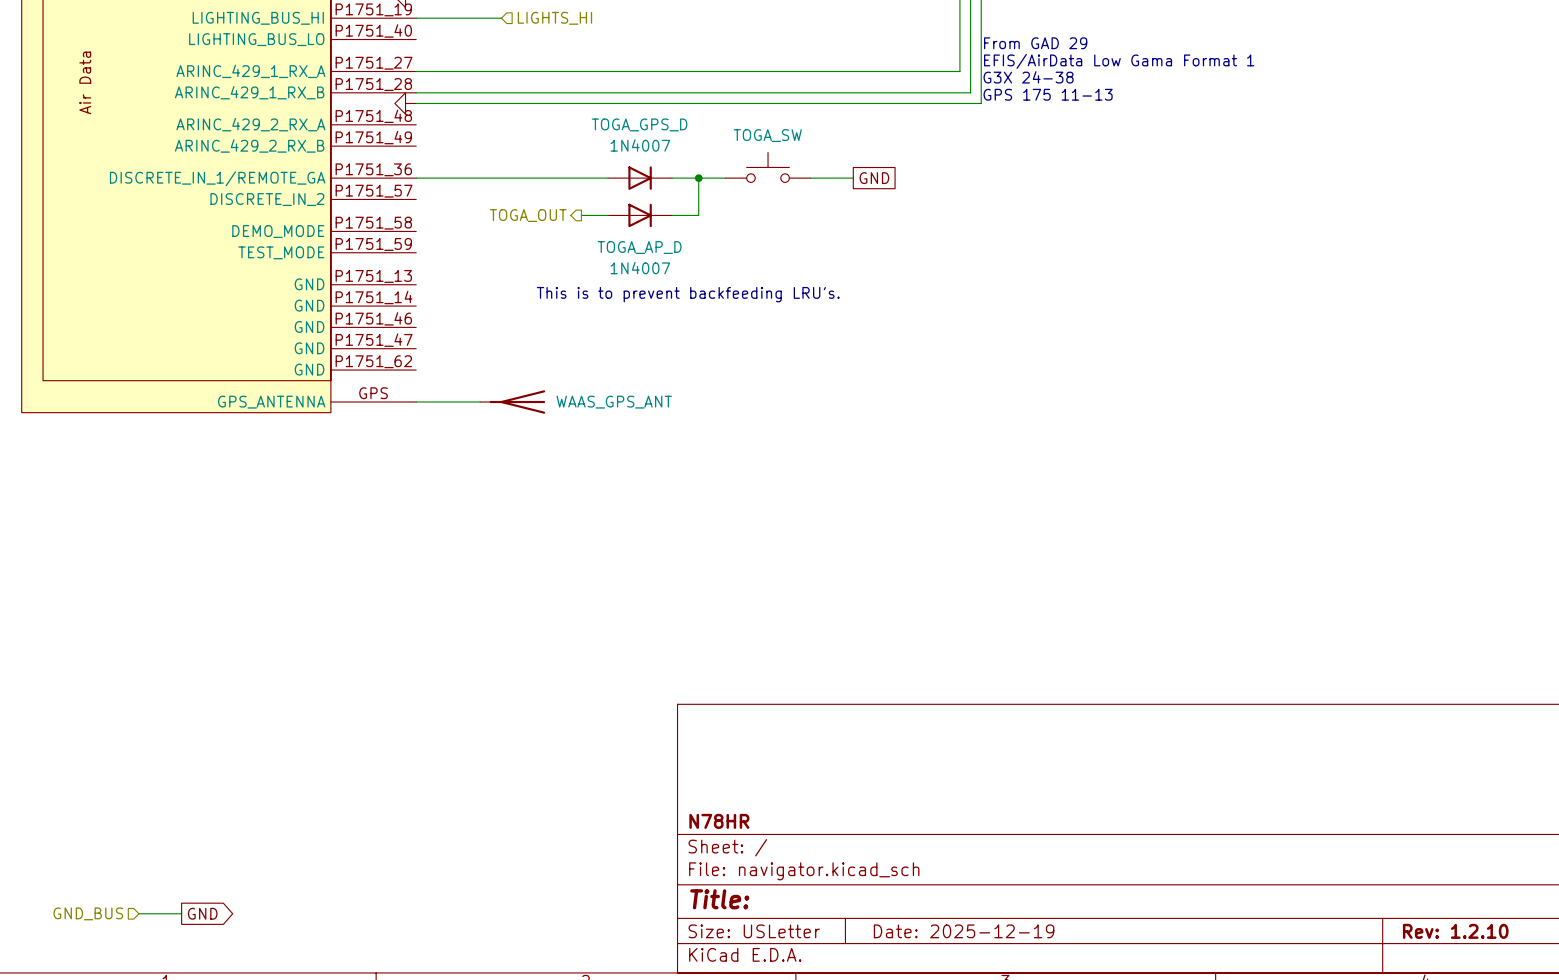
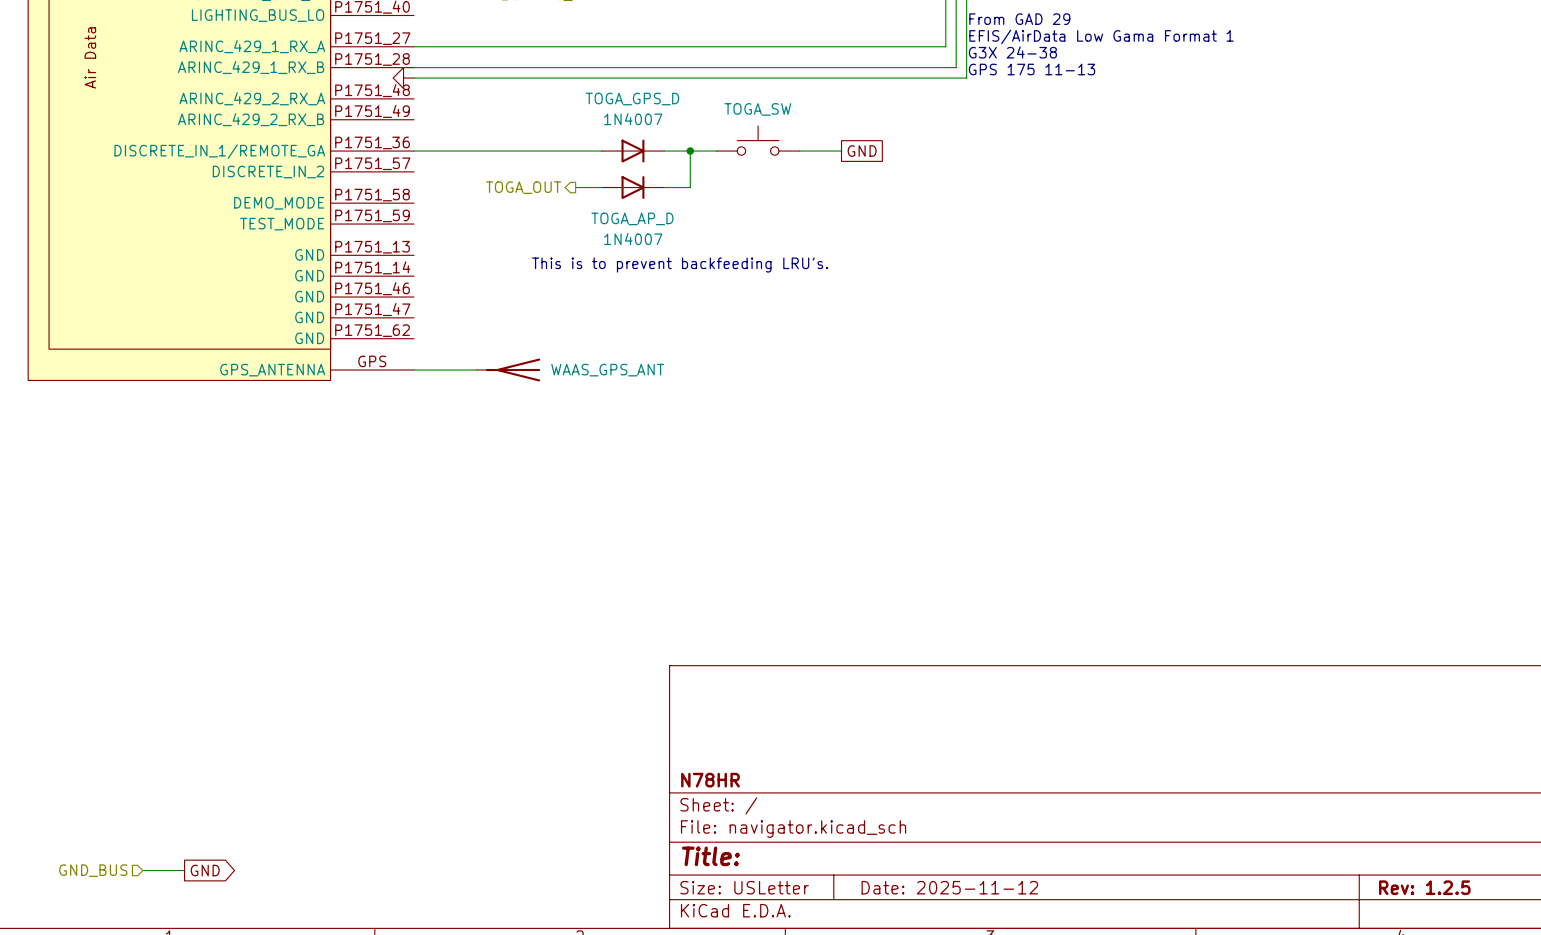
title block: Date: 2025-12-19 (964, 931) -> Date: 2025-11-12 (949, 887)
title block: Rev: 1.2.10 (1455, 931) -> Rev: 1.2.5 (1424, 887)

